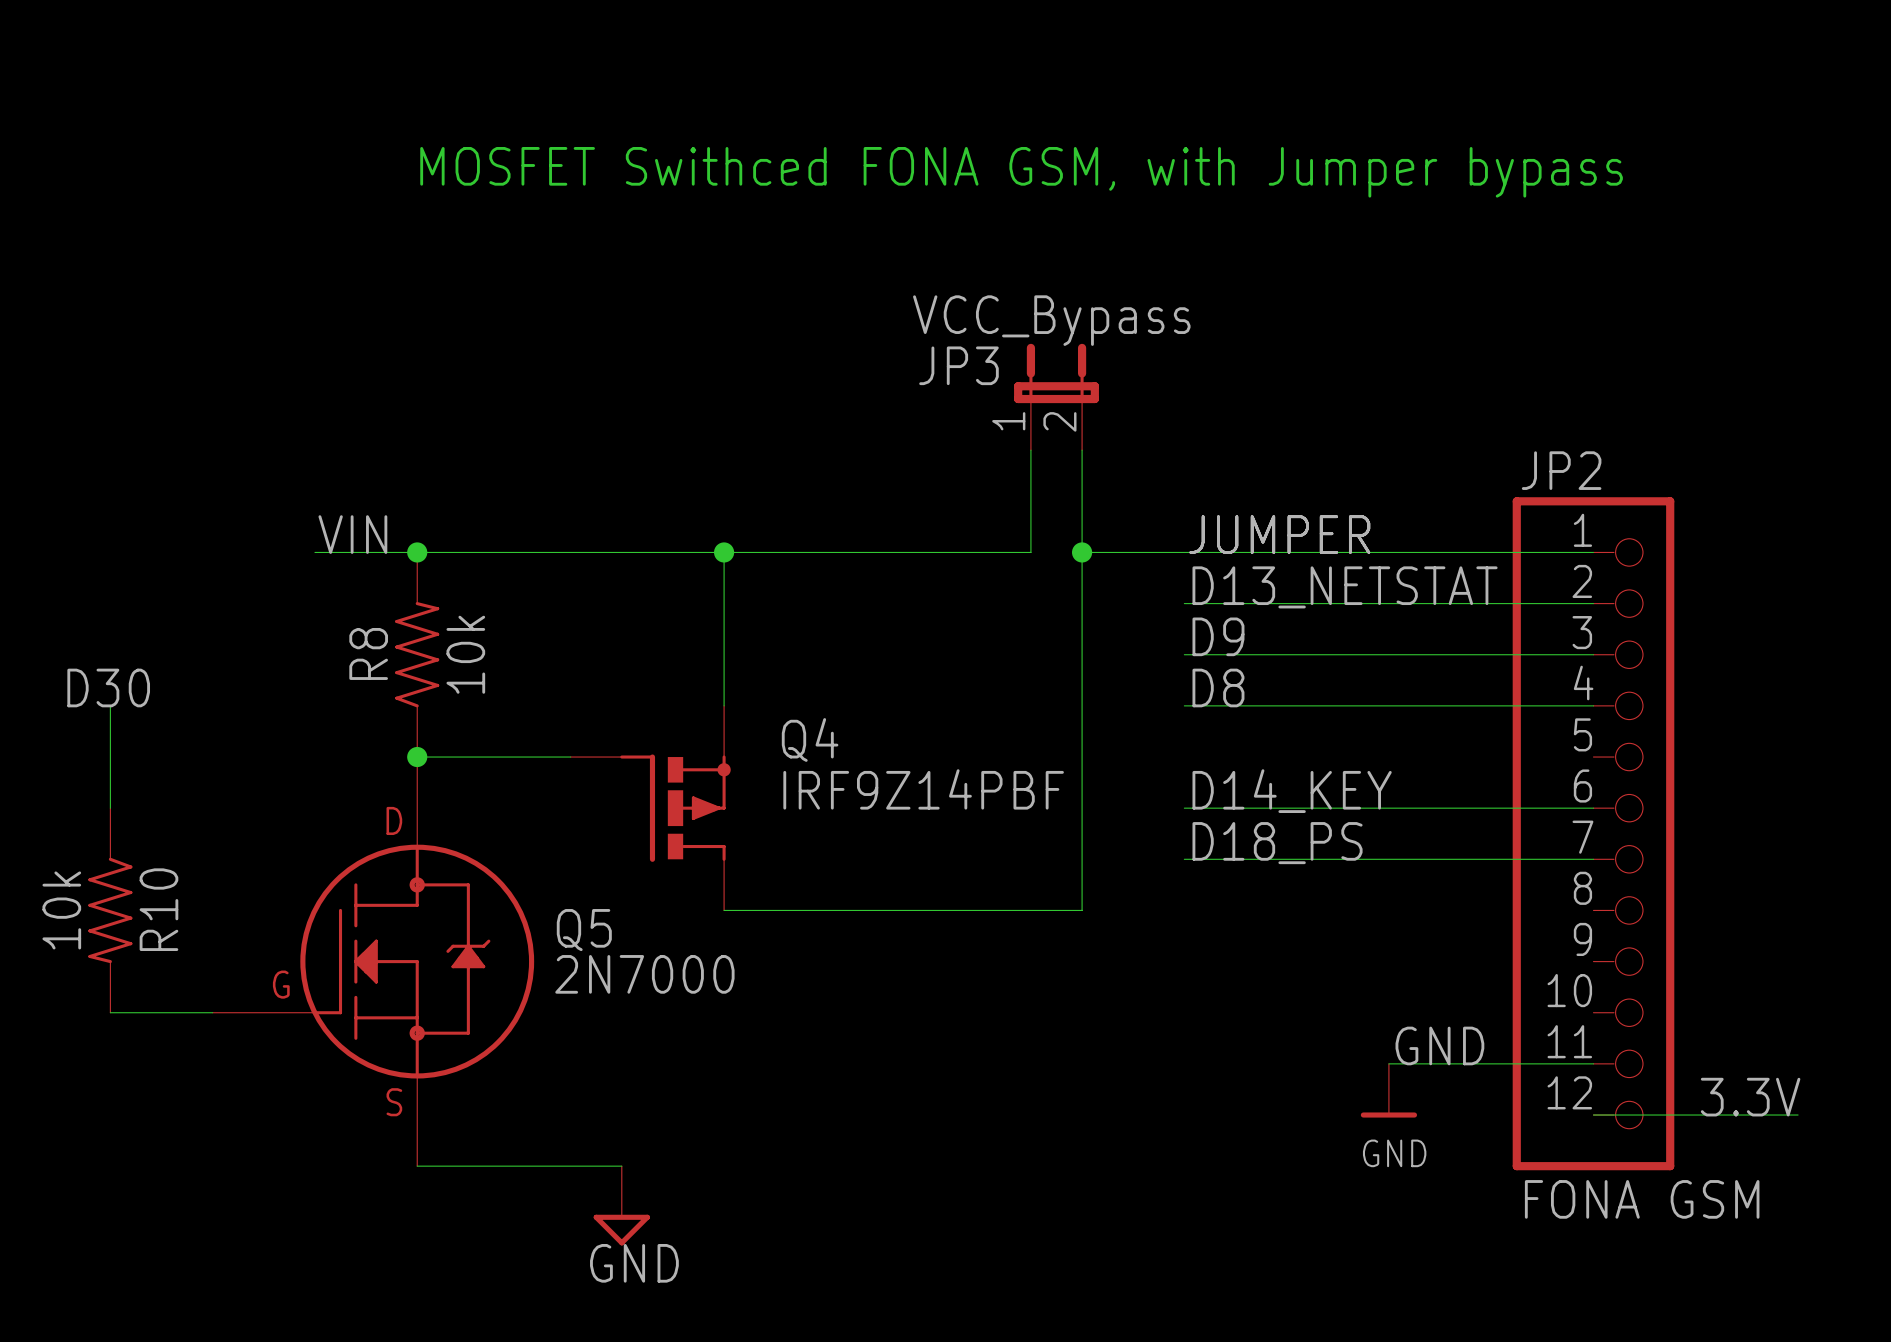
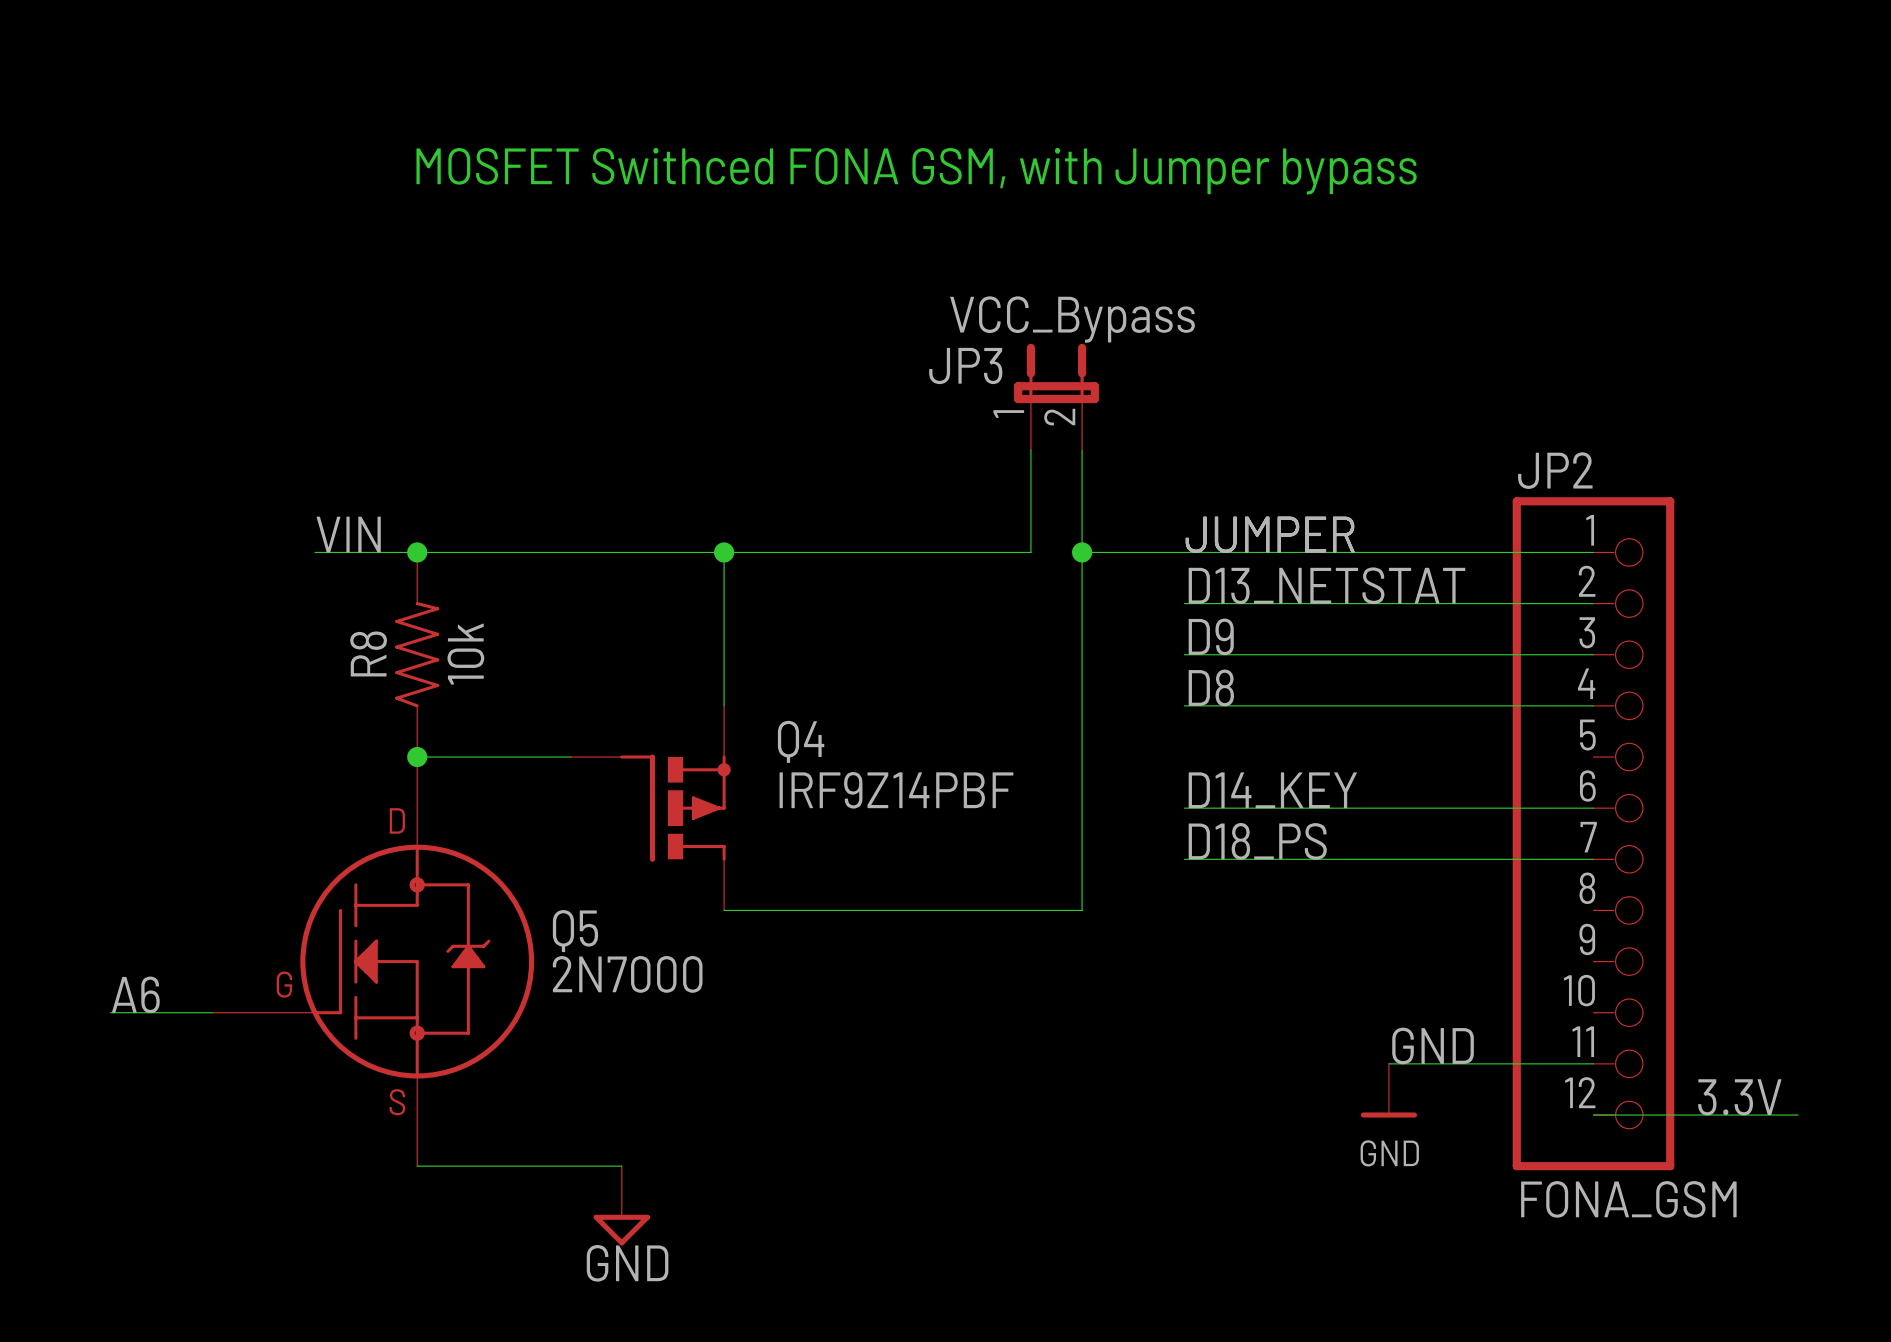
label: D30 (108, 687) -> none
wire: (110, 705) (110, 808) -> none
R10: 10k (110, 910) -> none
label: none -> A6 (135, 994)
JP2 value: FONA GSM (1642, 1199) -> FONA_GSM (1628, 1199)

